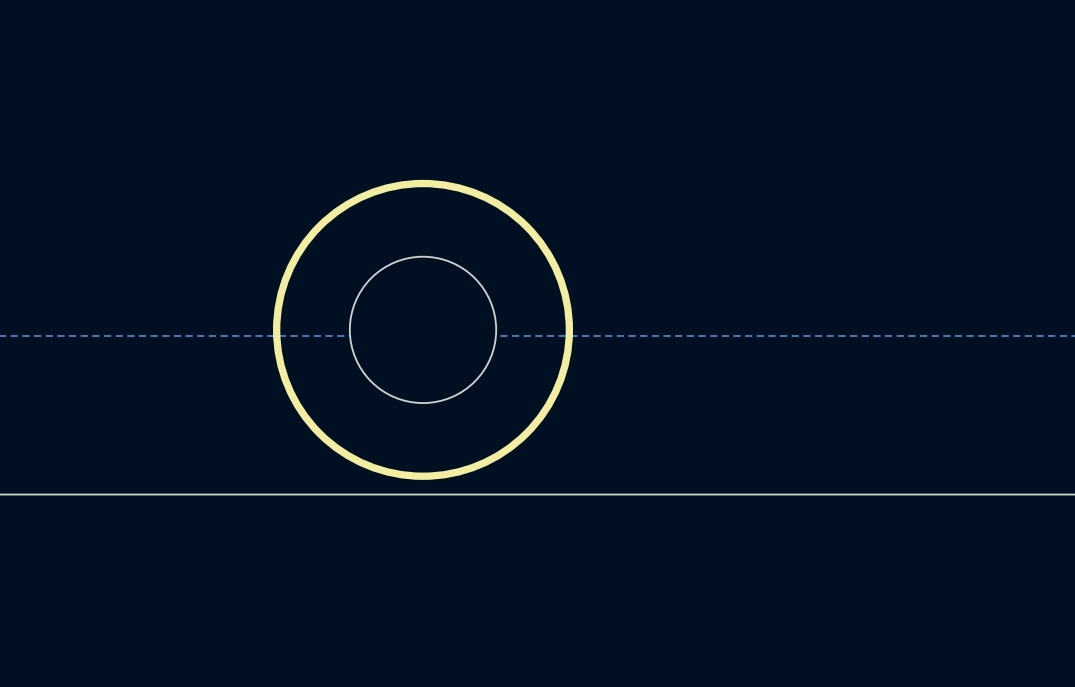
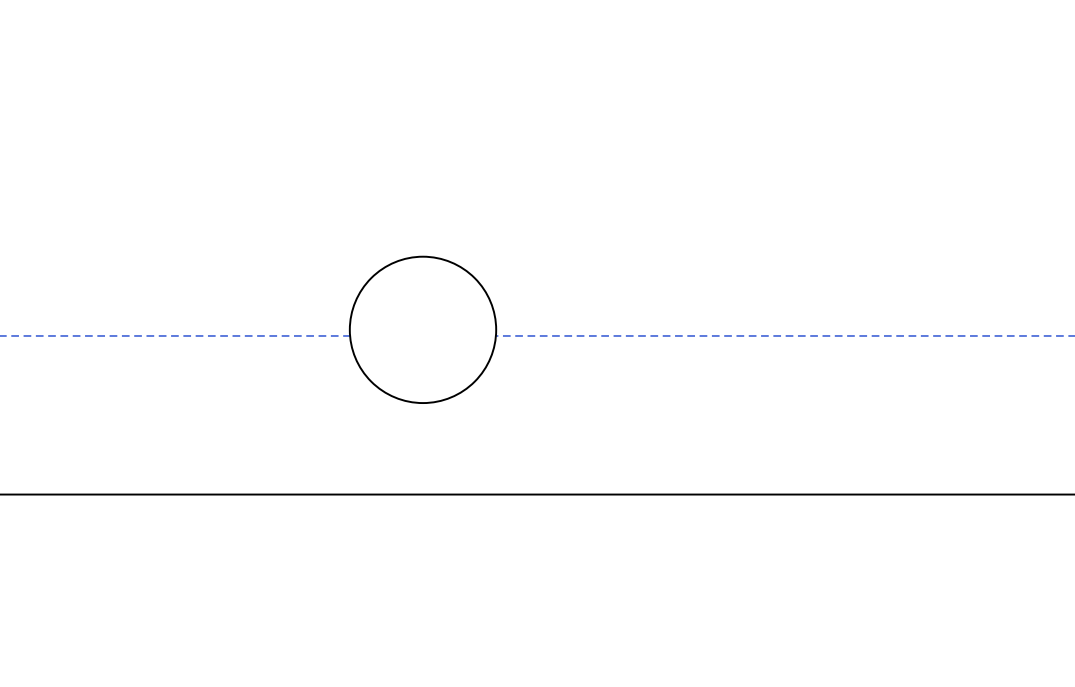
drawing: [272, 179, 574, 480] -> none

